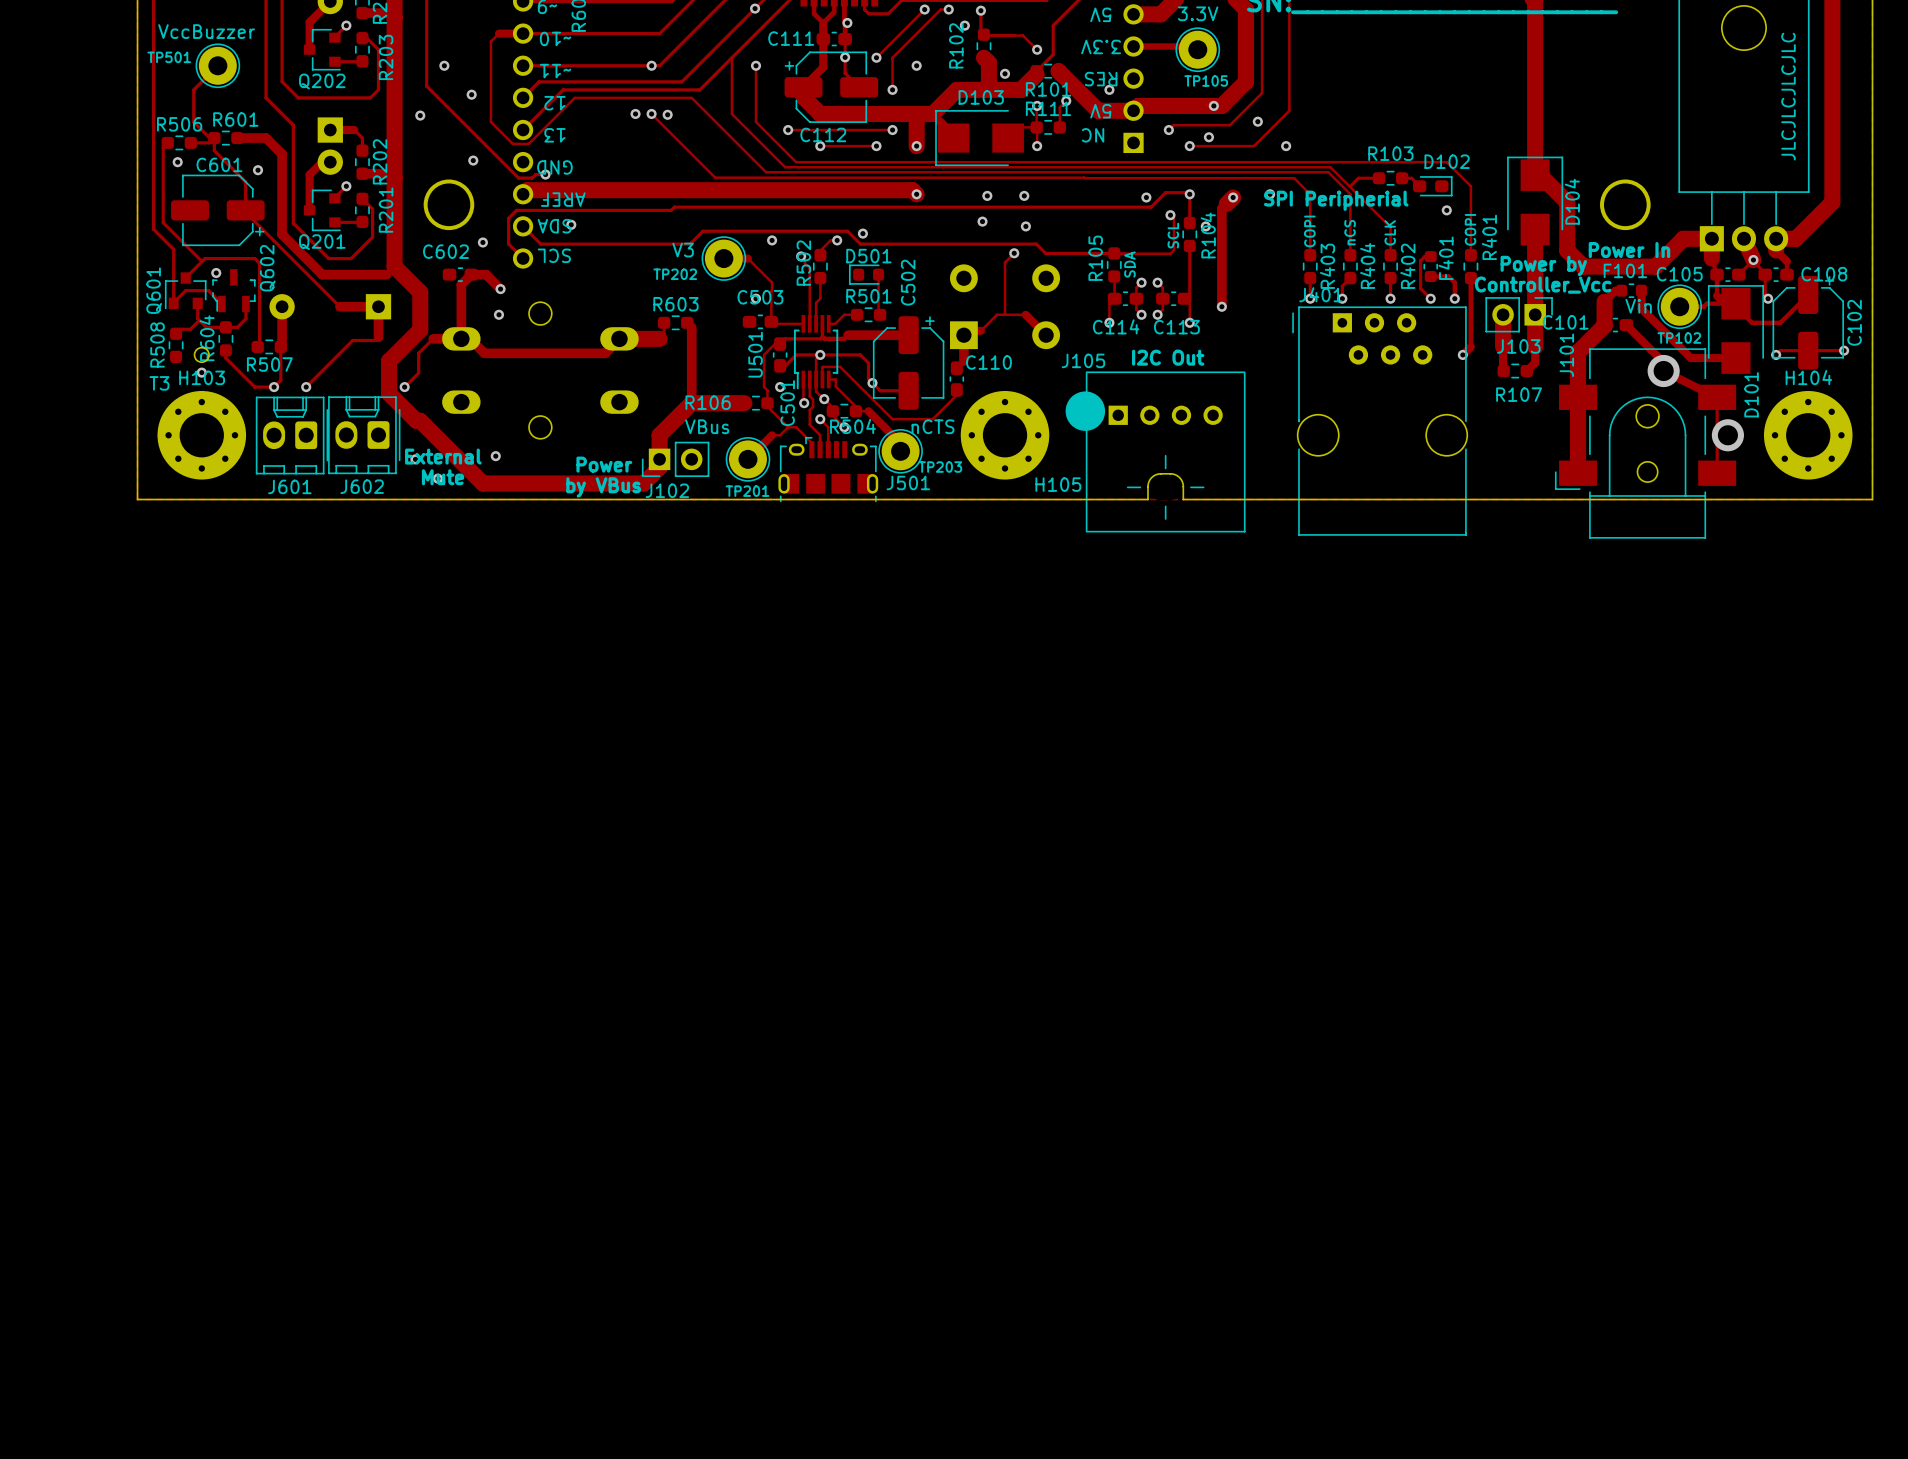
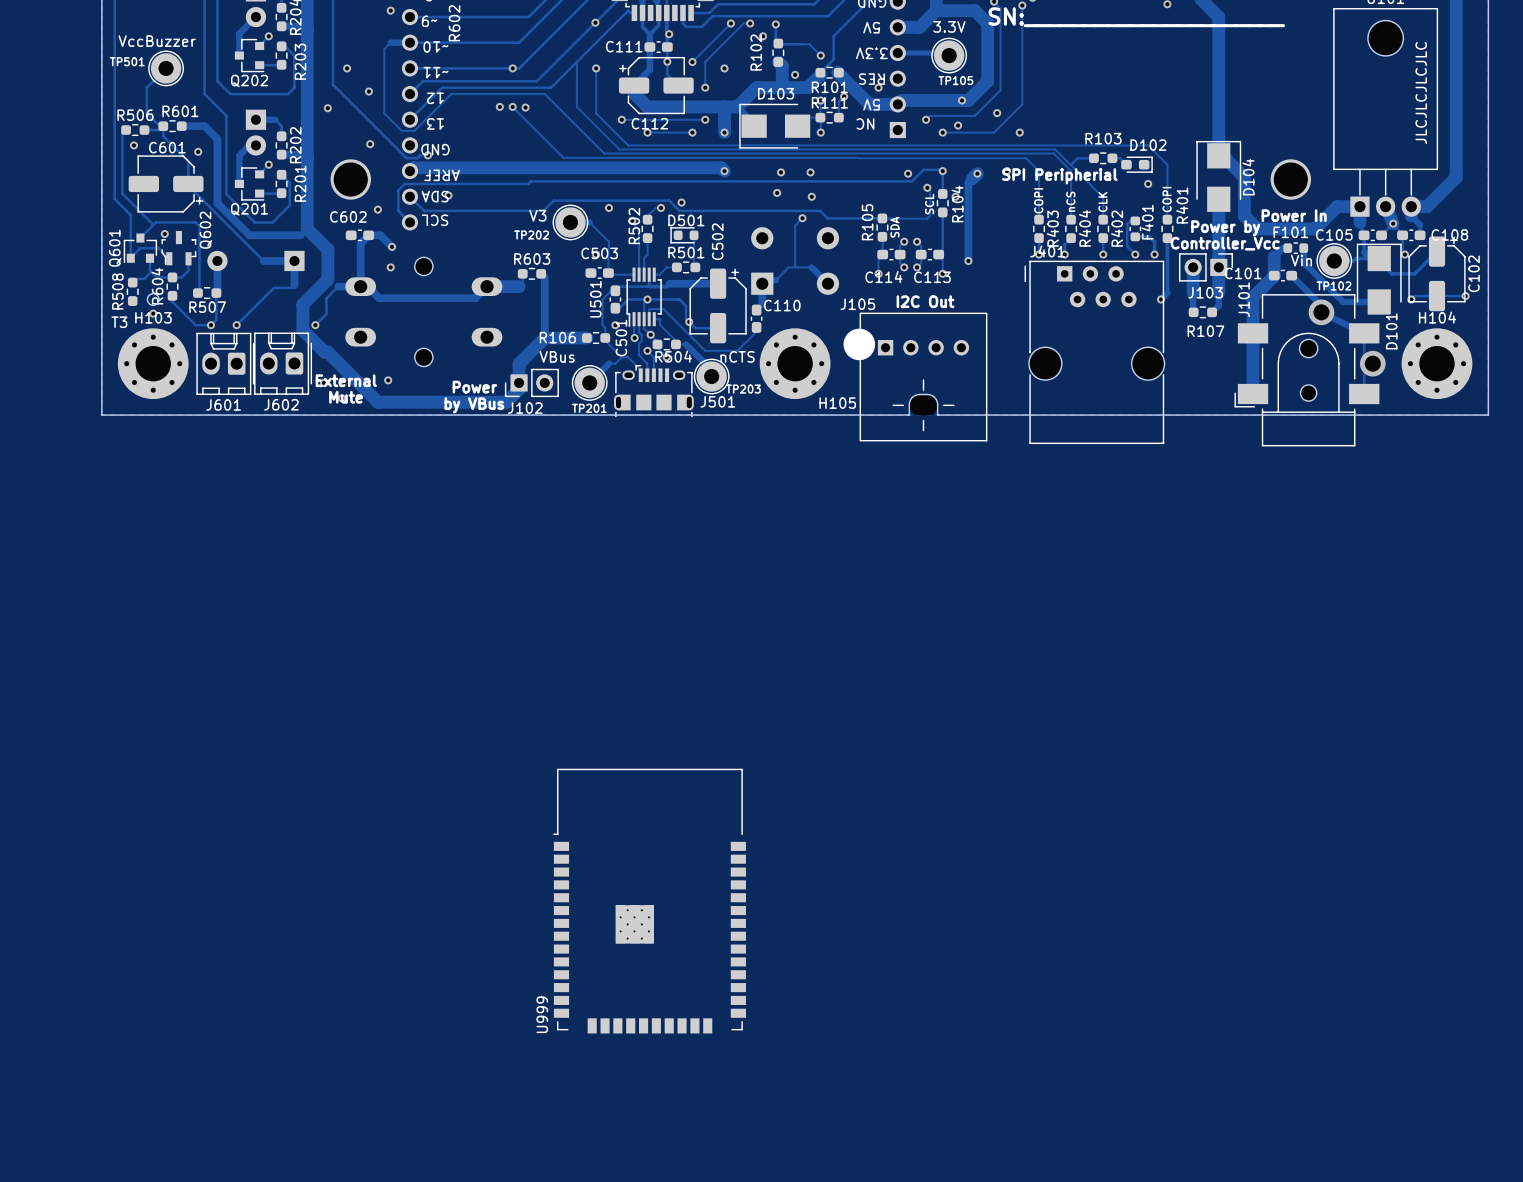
U999: none -> (649, 901)

